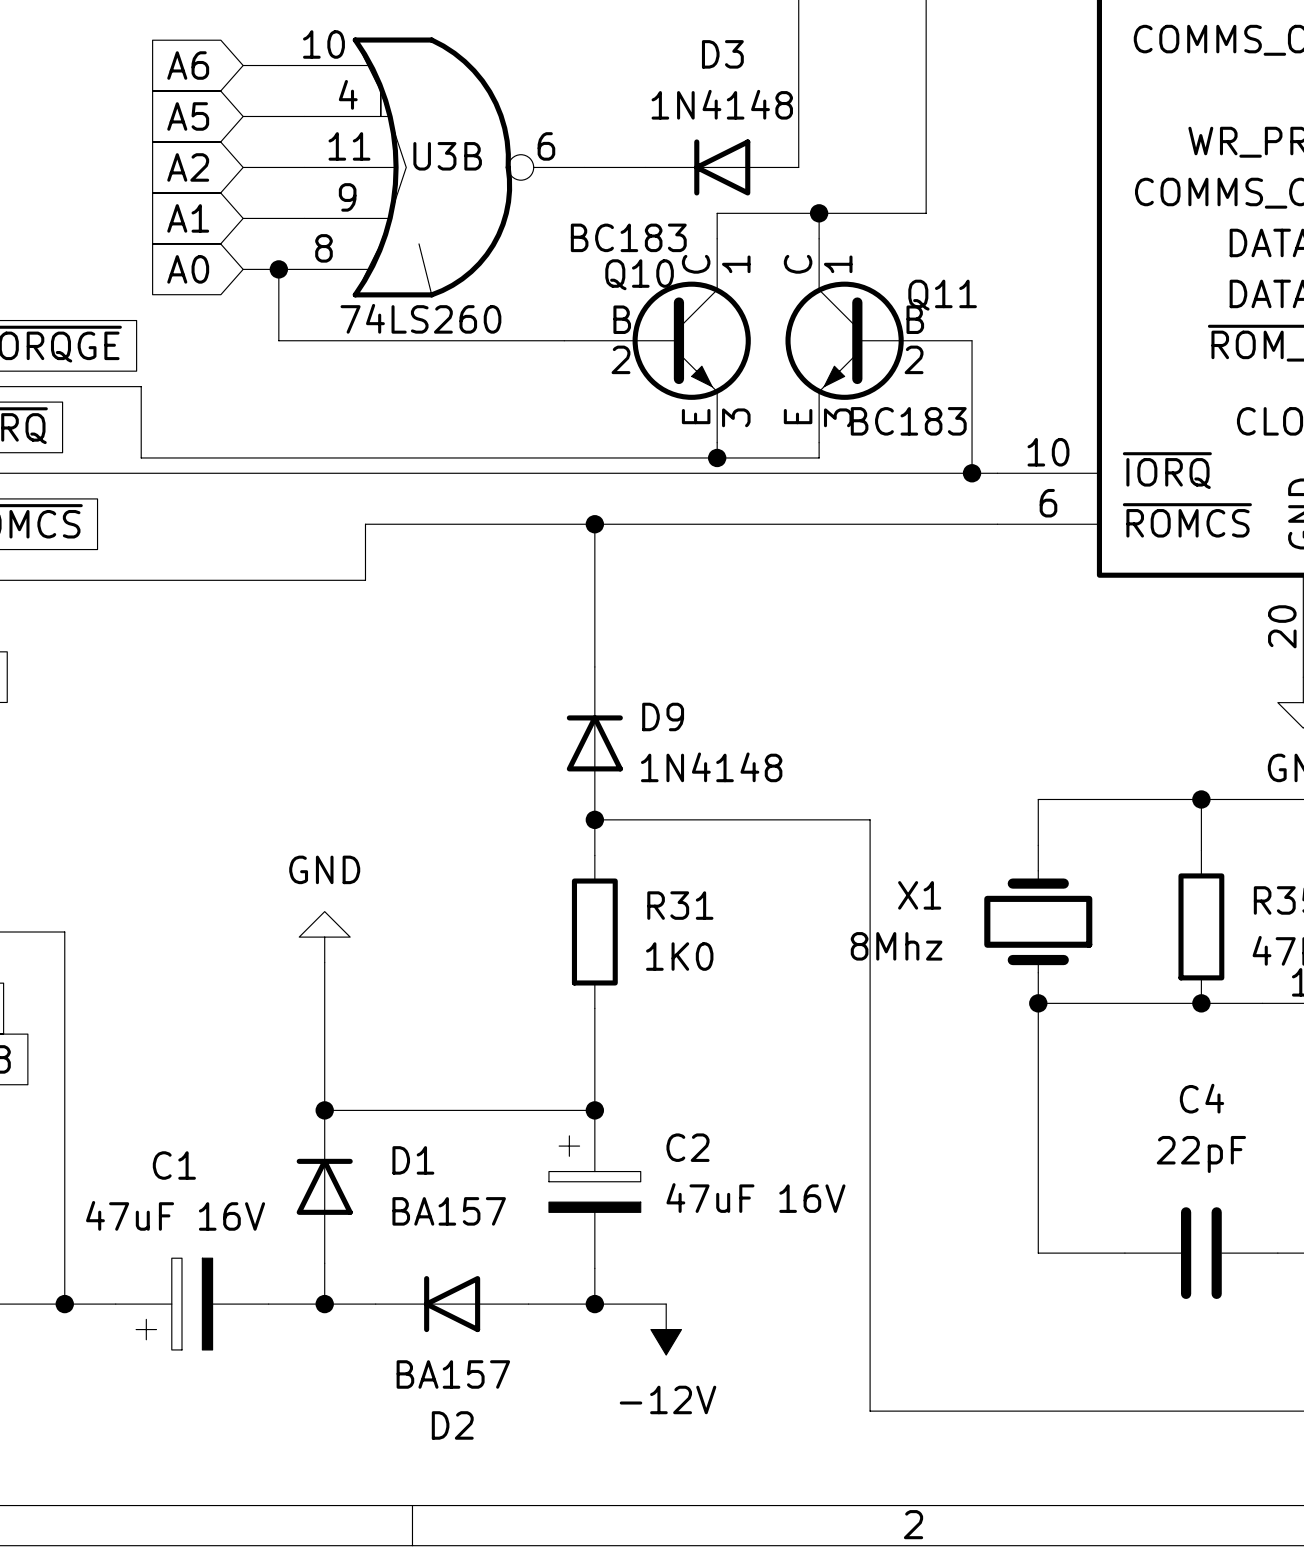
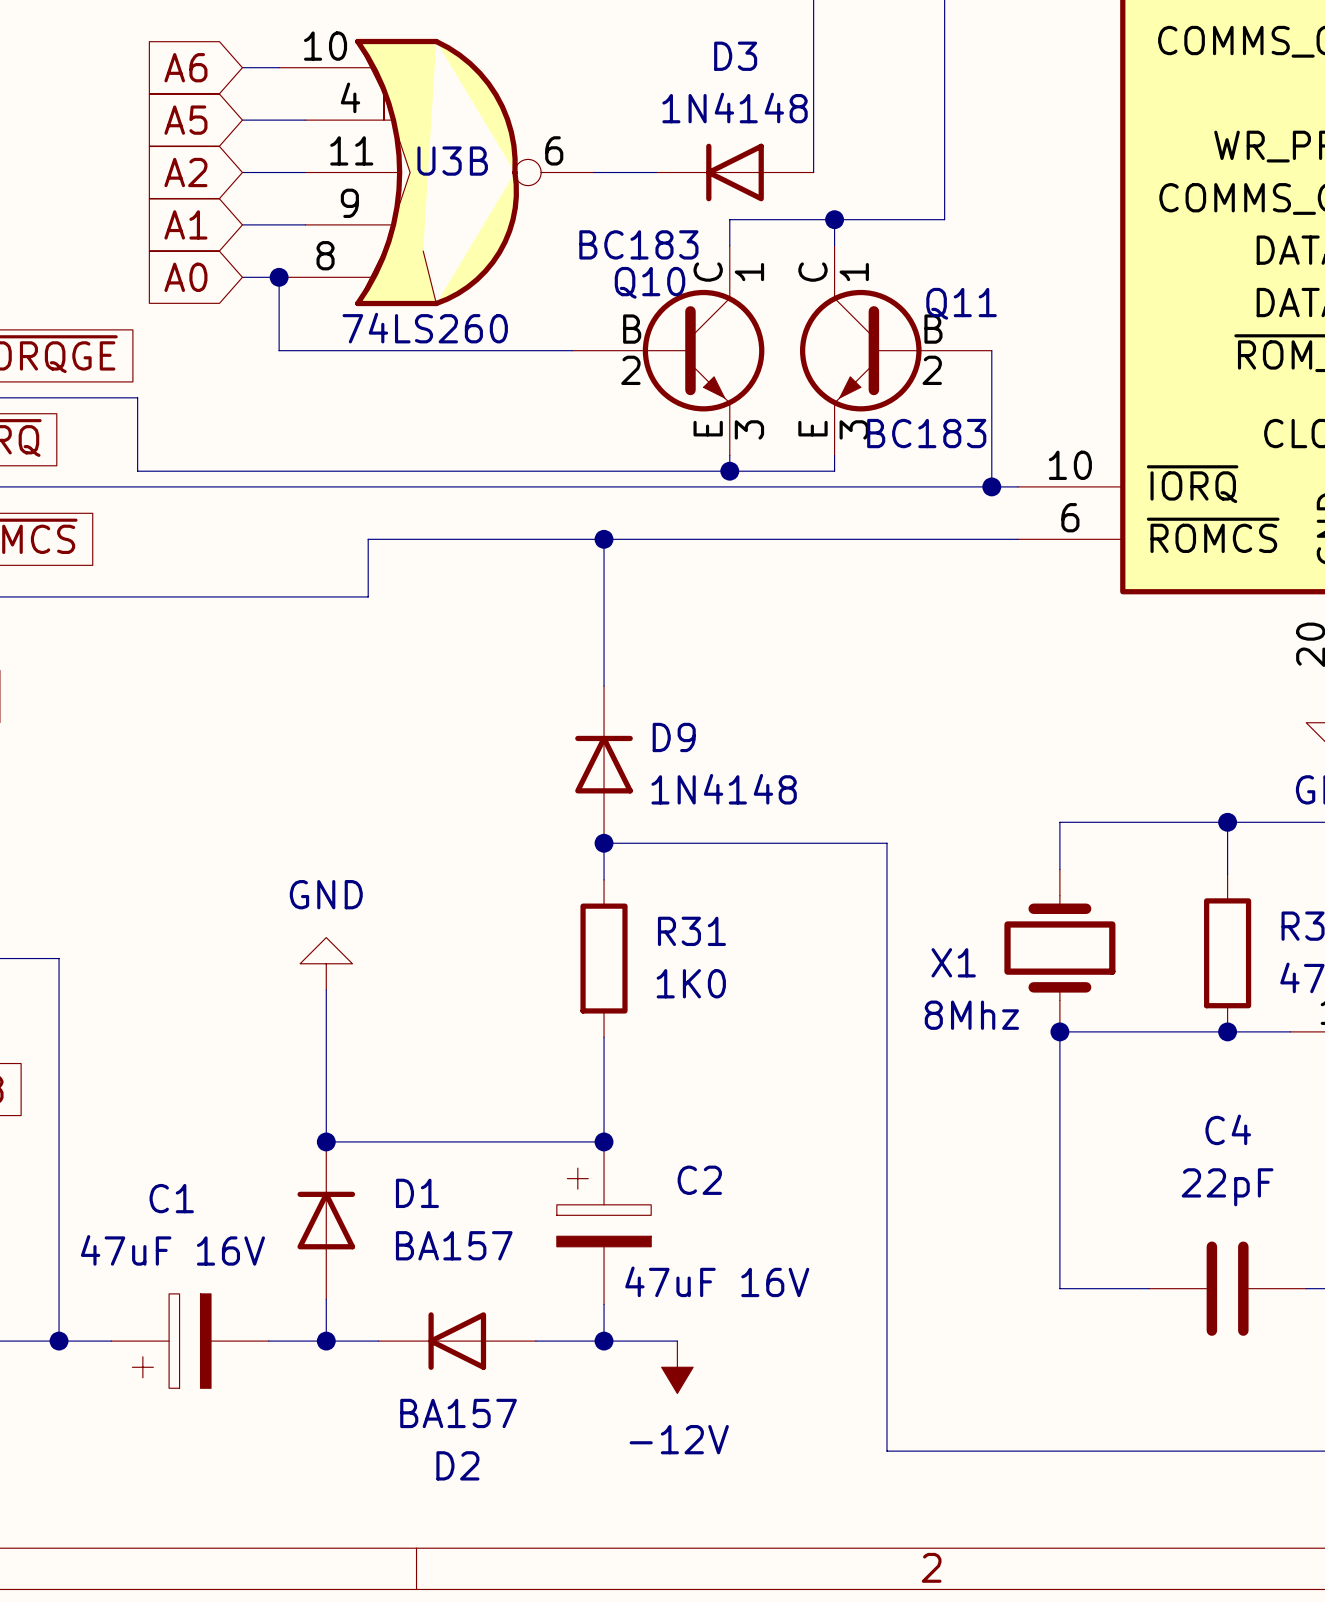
X1 name position: X1 (919, 895) -> X1 (953, 962)
X1 value position: 8Mhz (896, 946) -> 8Mhz (971, 1015)
C2 value position: 47uF 16V (755, 1198) -> 47uF 16V (717, 1281)

